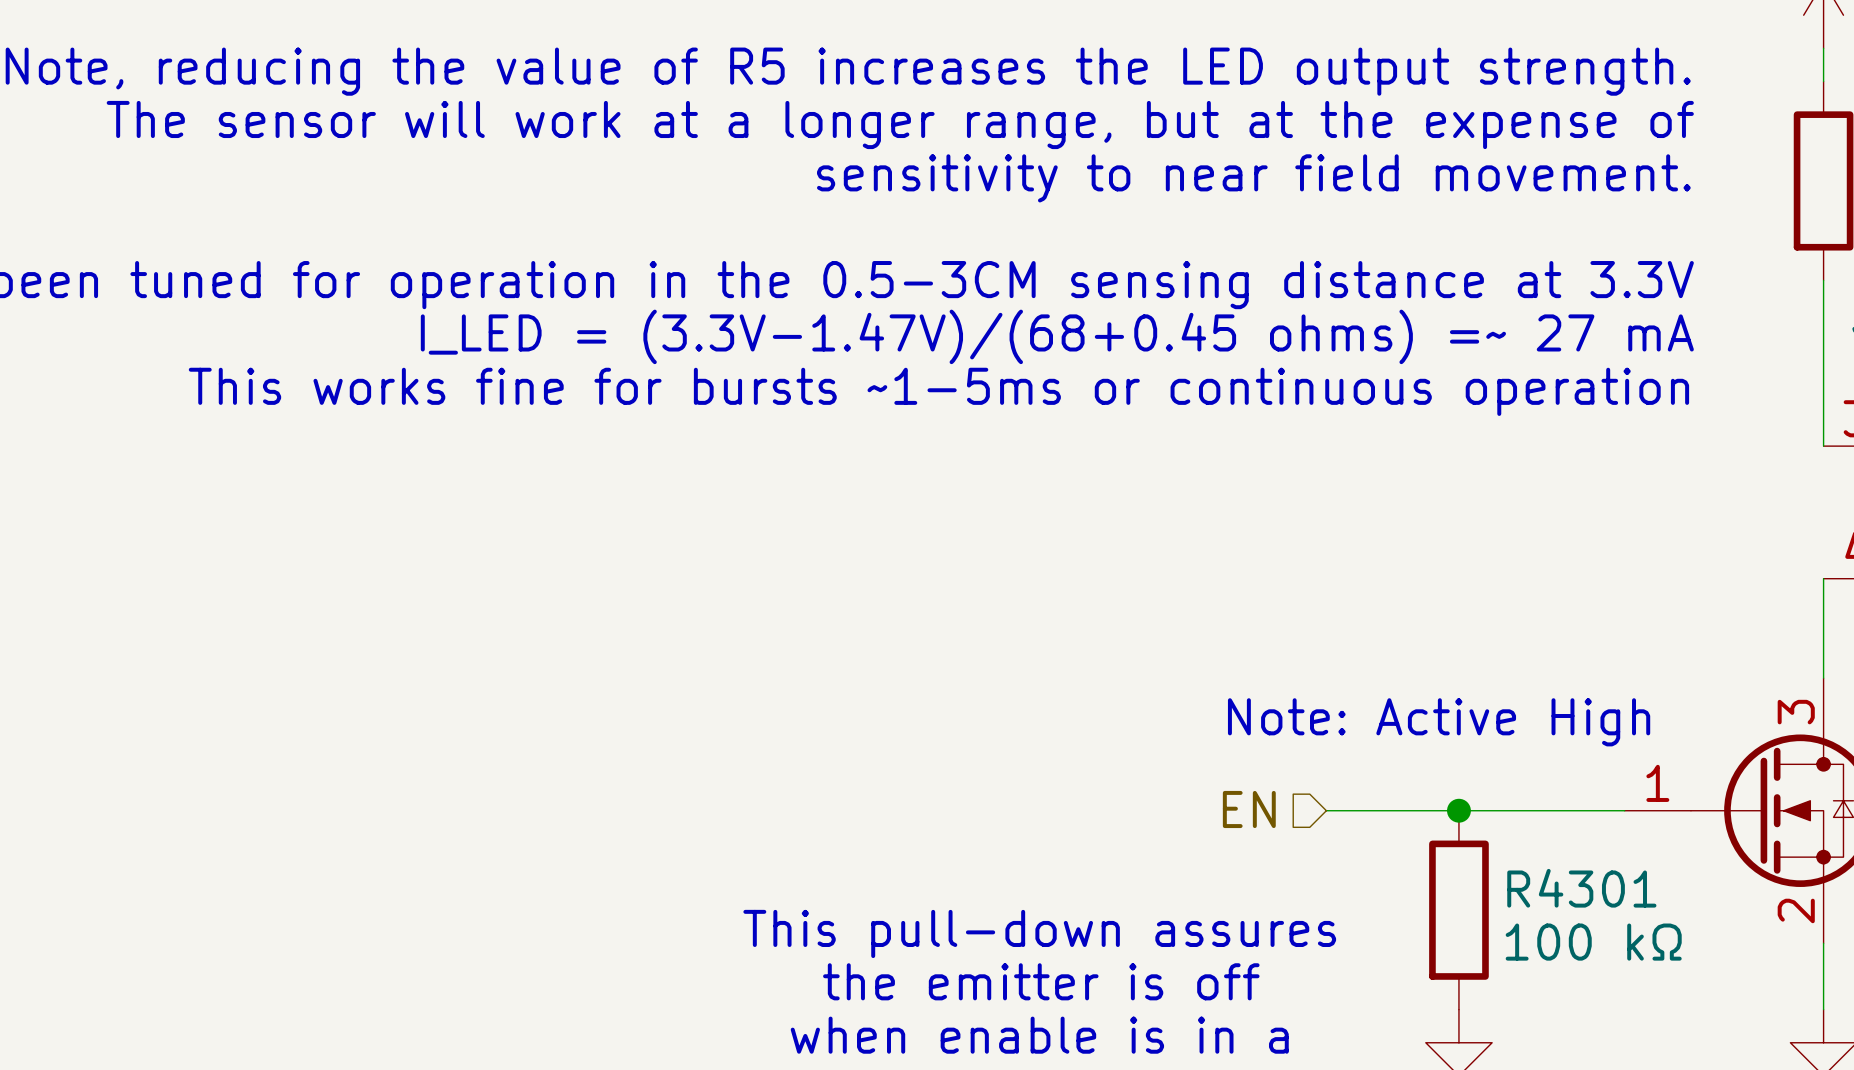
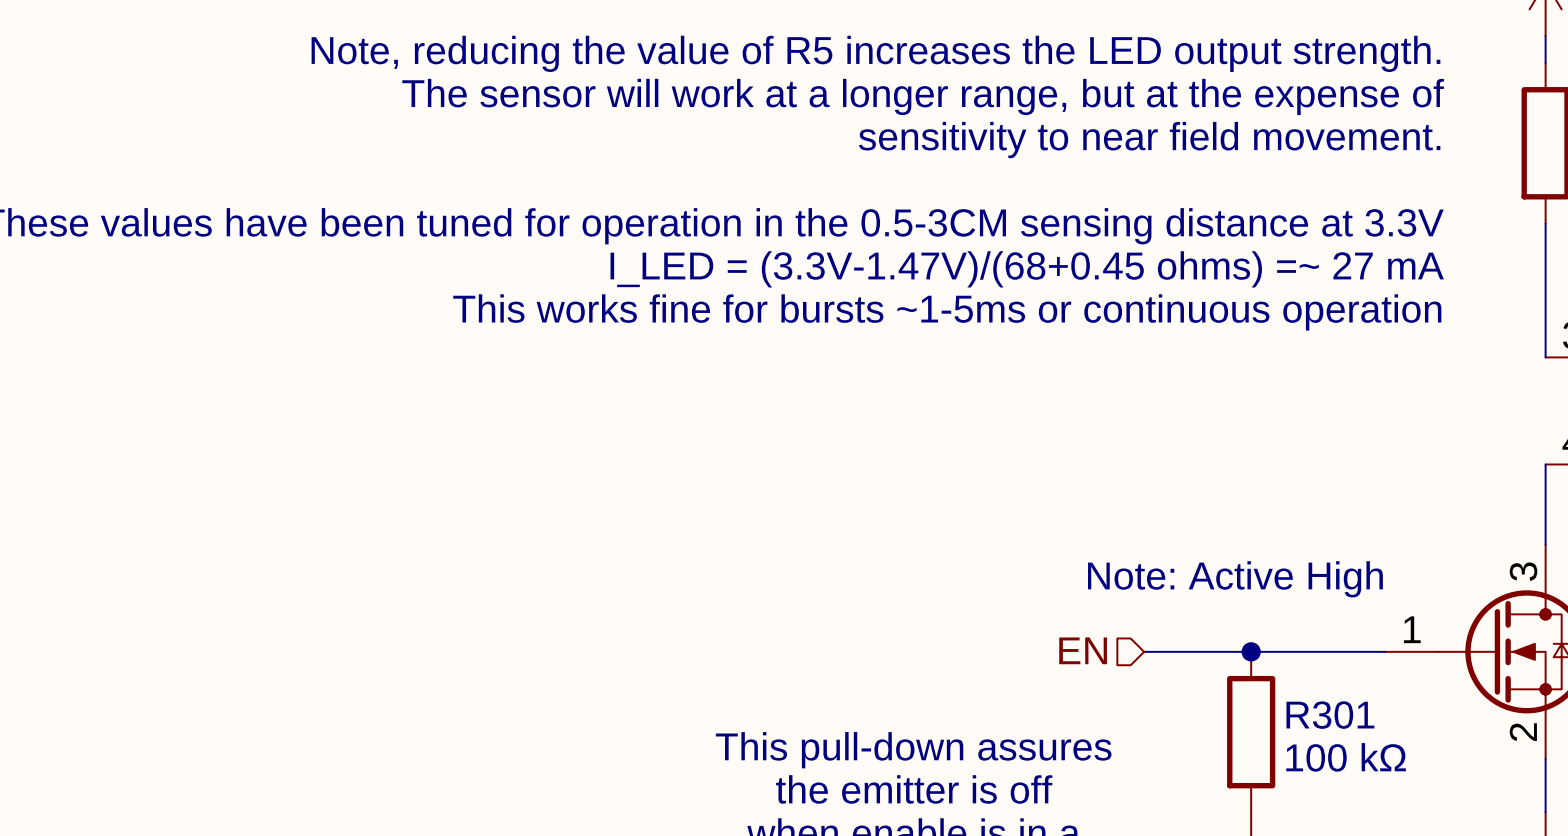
R4301 name: R4301 (1581, 888) -> R301 (1330, 715)

